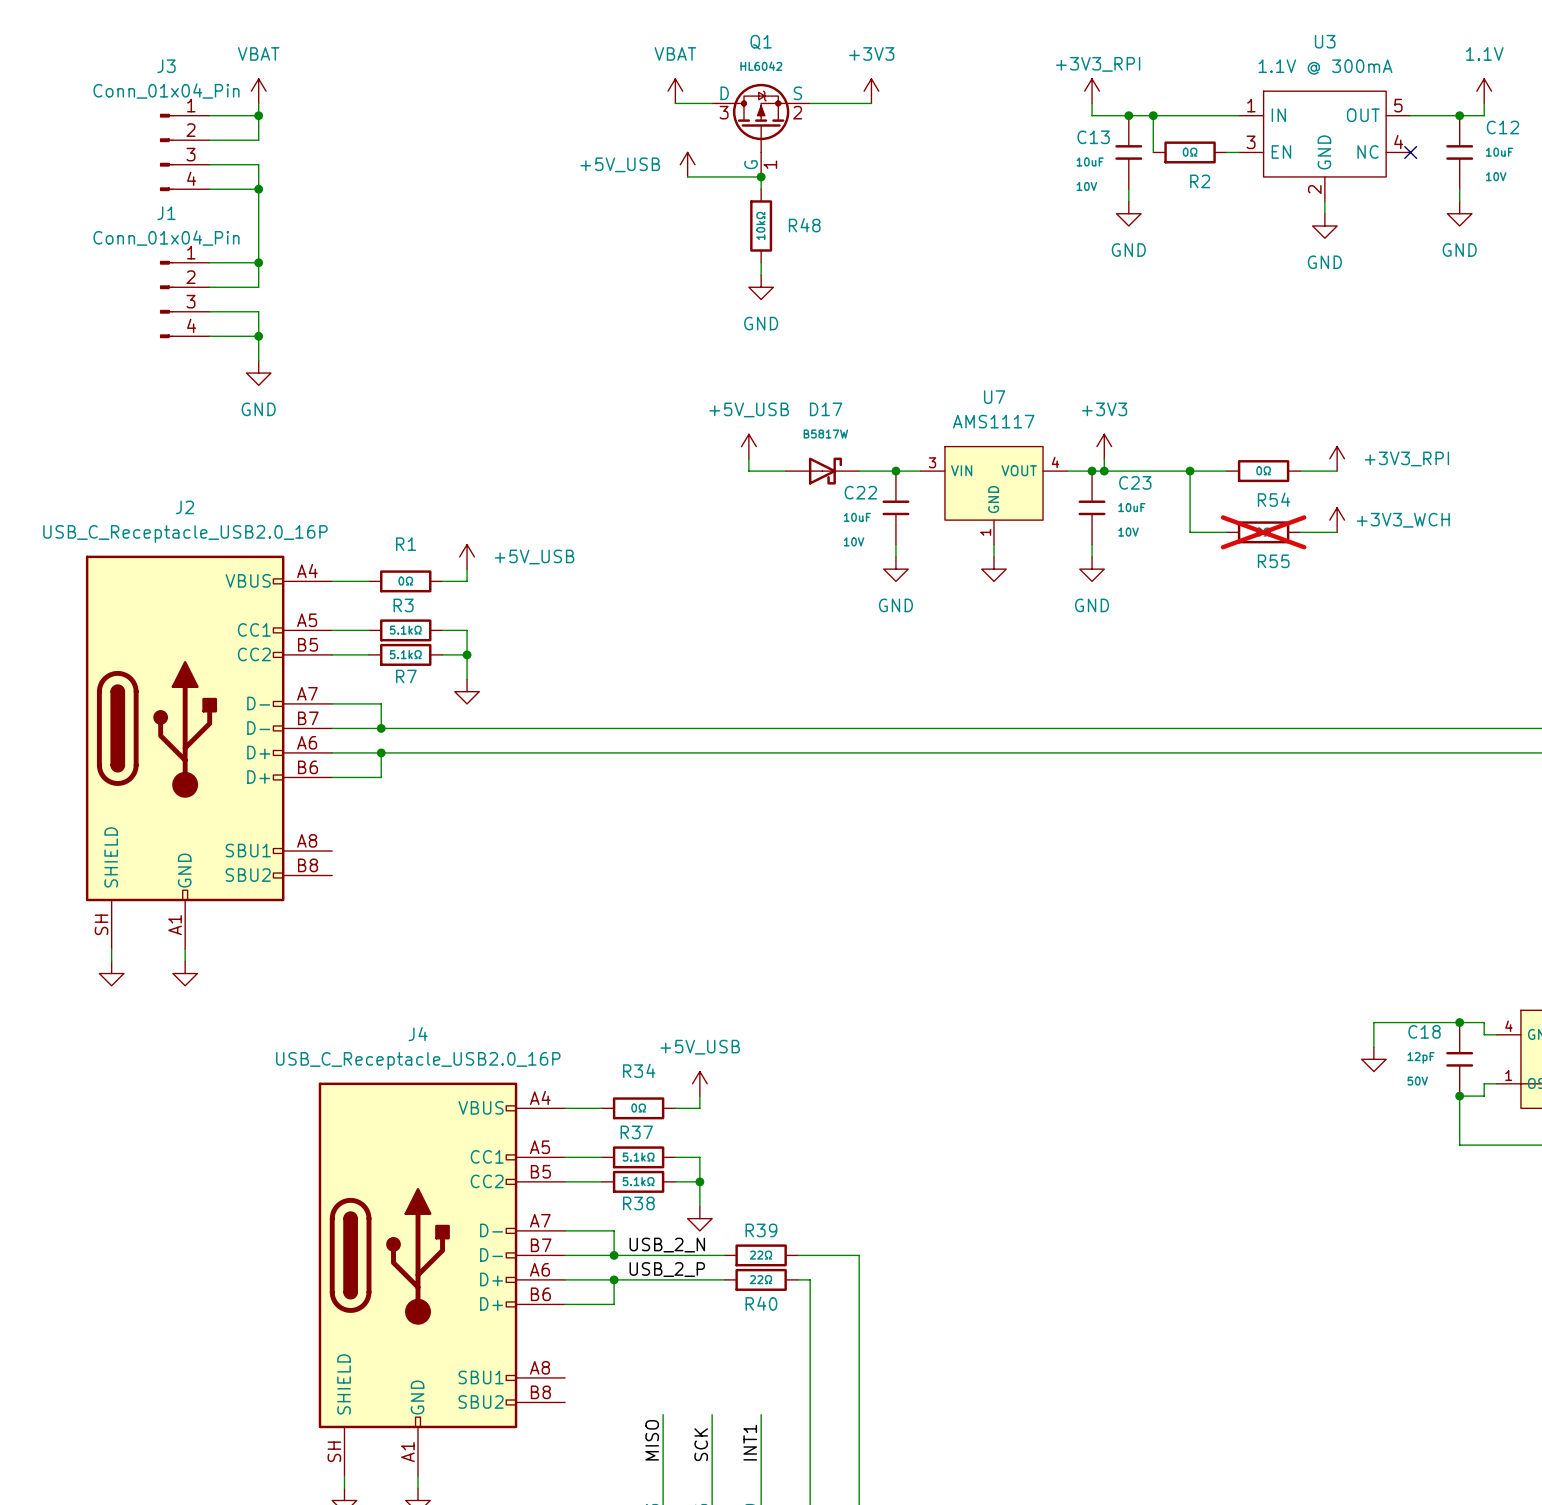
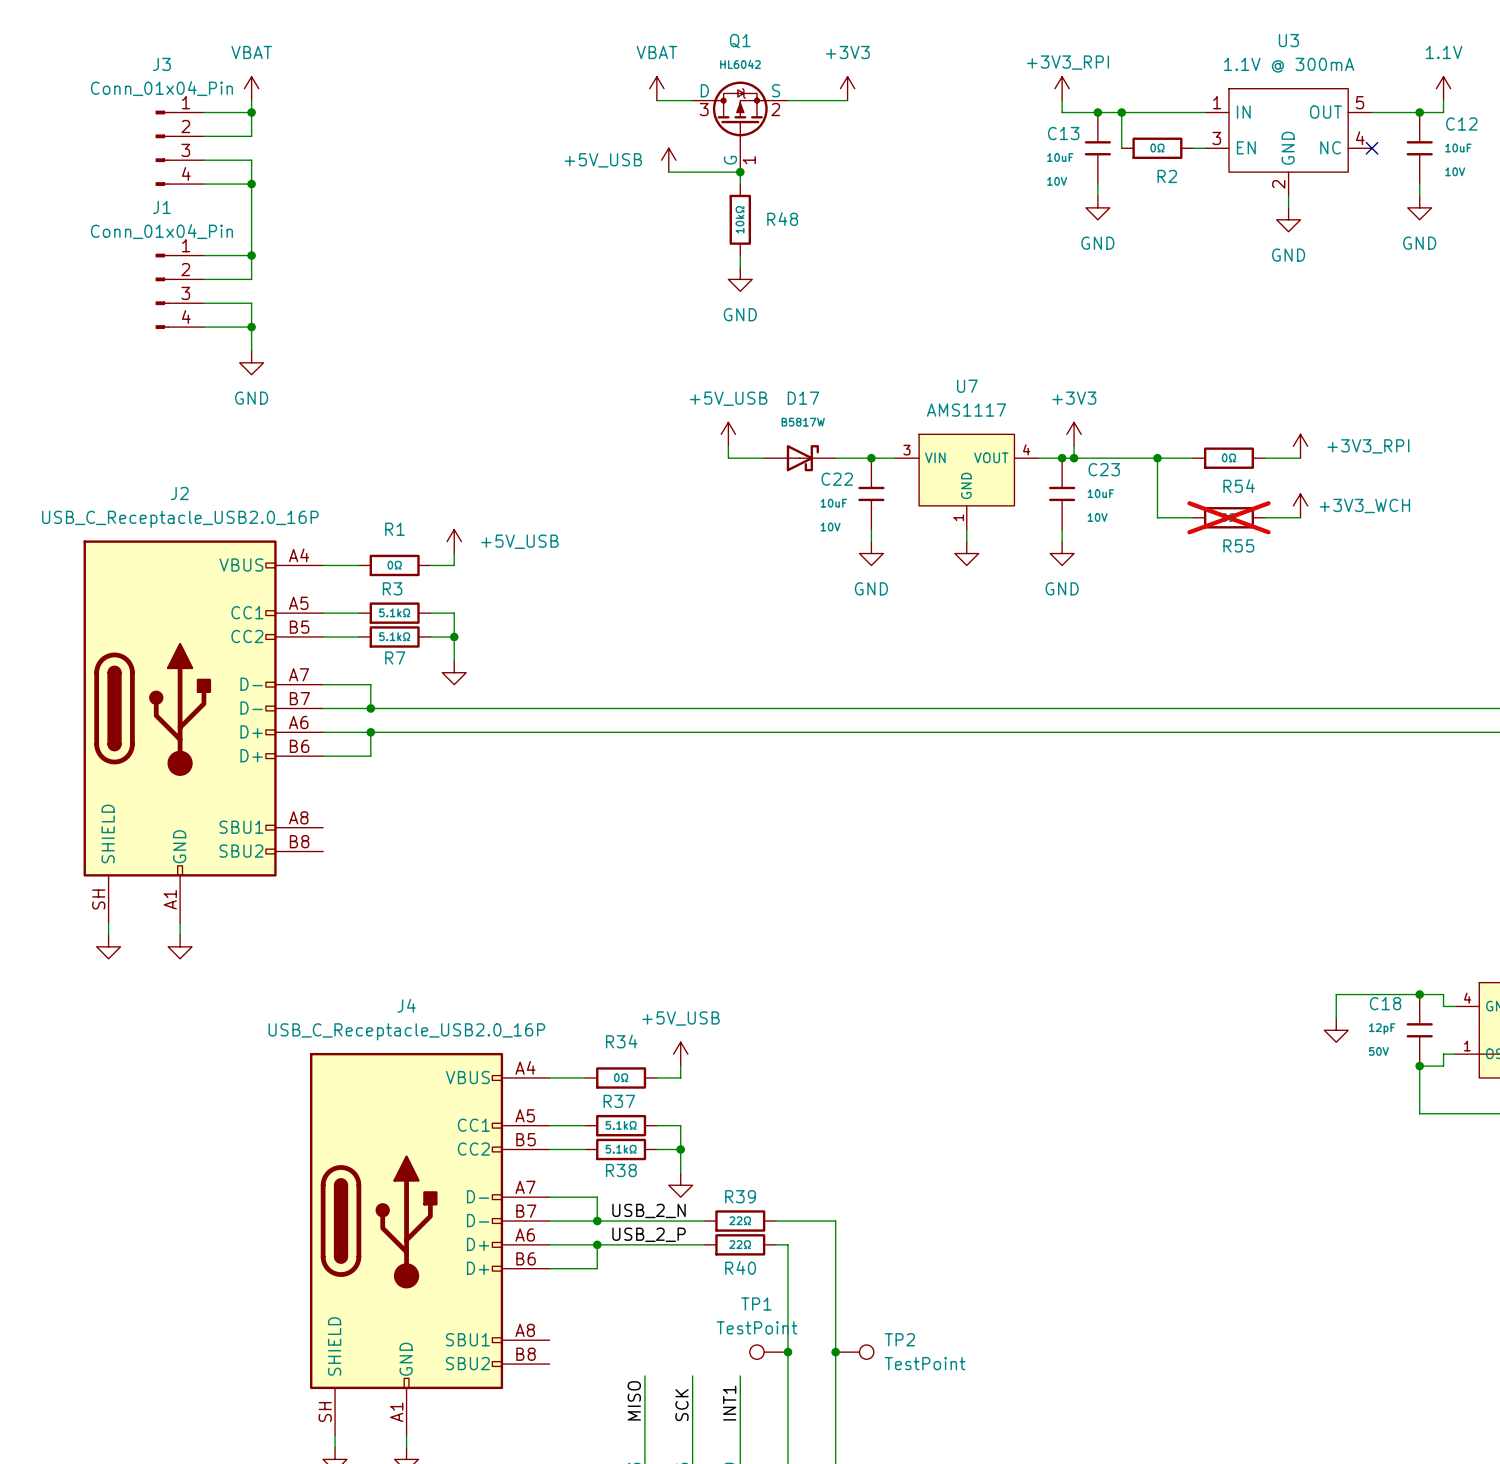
TP1: none -> TestPoint (768, 1352)
junction: none -> (787, 1352)
junction: none -> (835, 1352)
TP2: none -> TestPoint (854, 1352)

